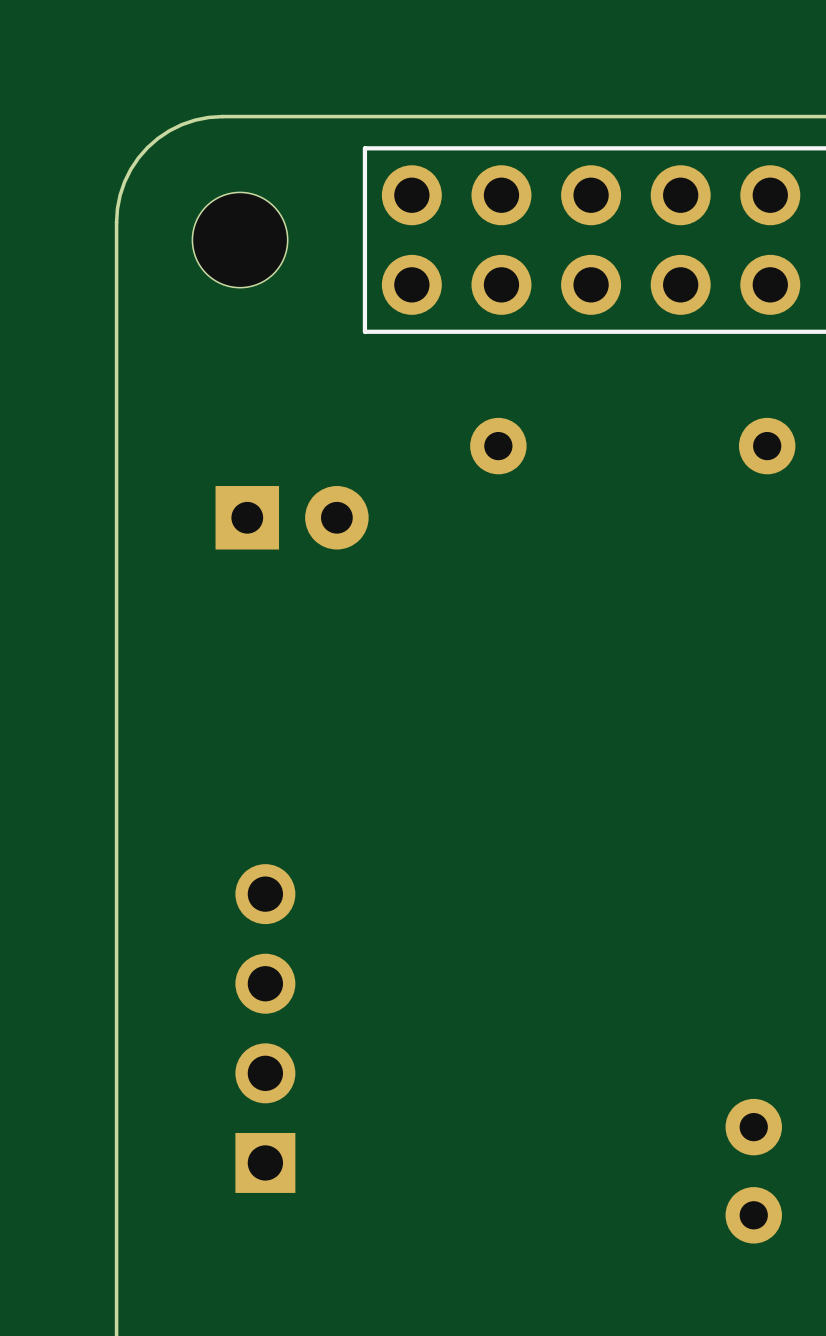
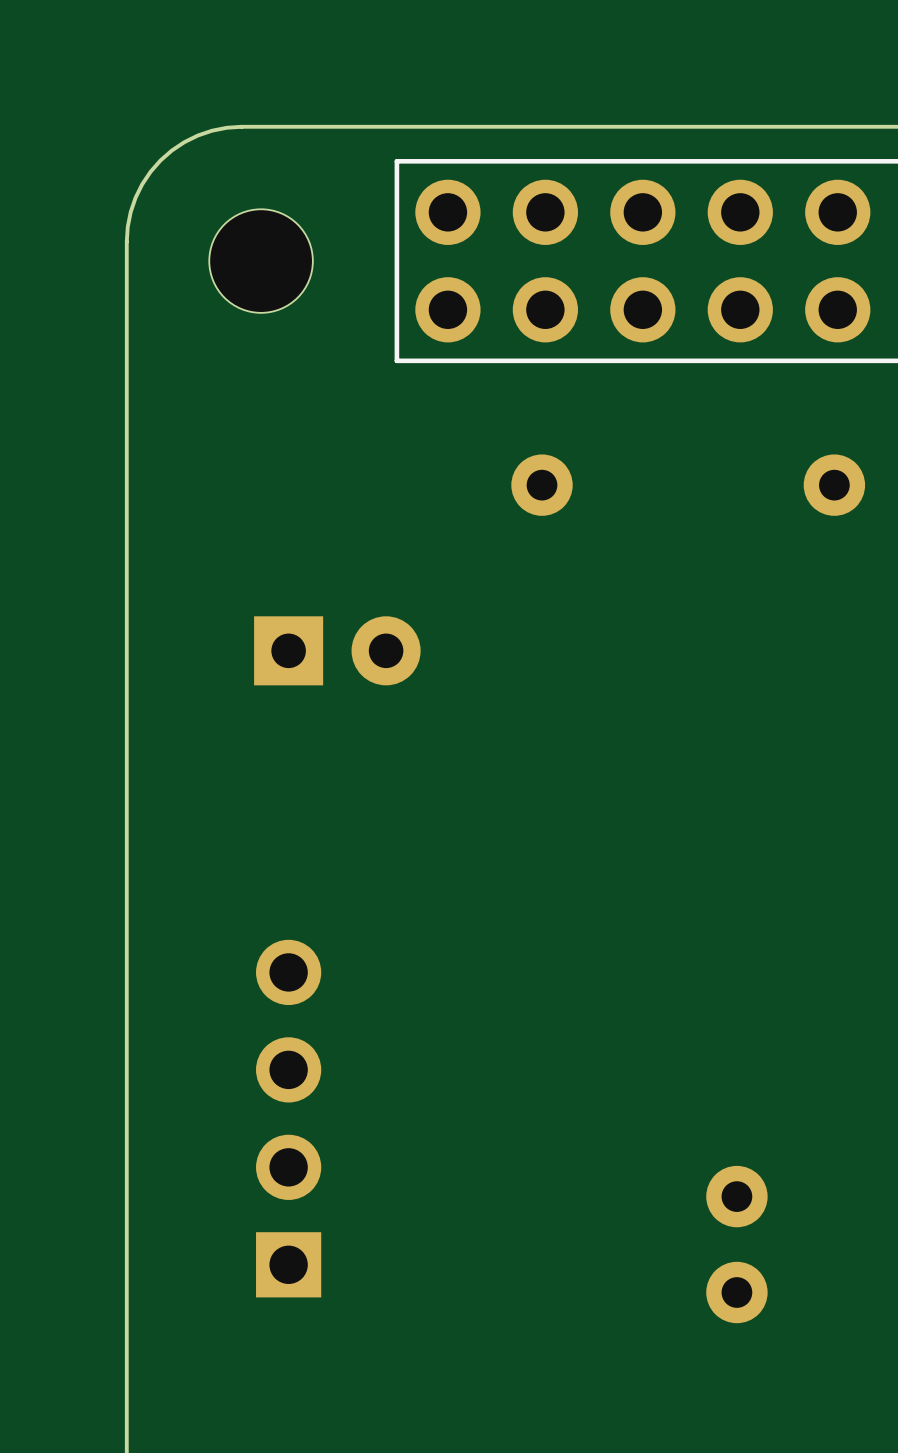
part position: (292, 517) -> (337, 650)
part position: (753, 1171) -> (736, 1244)

